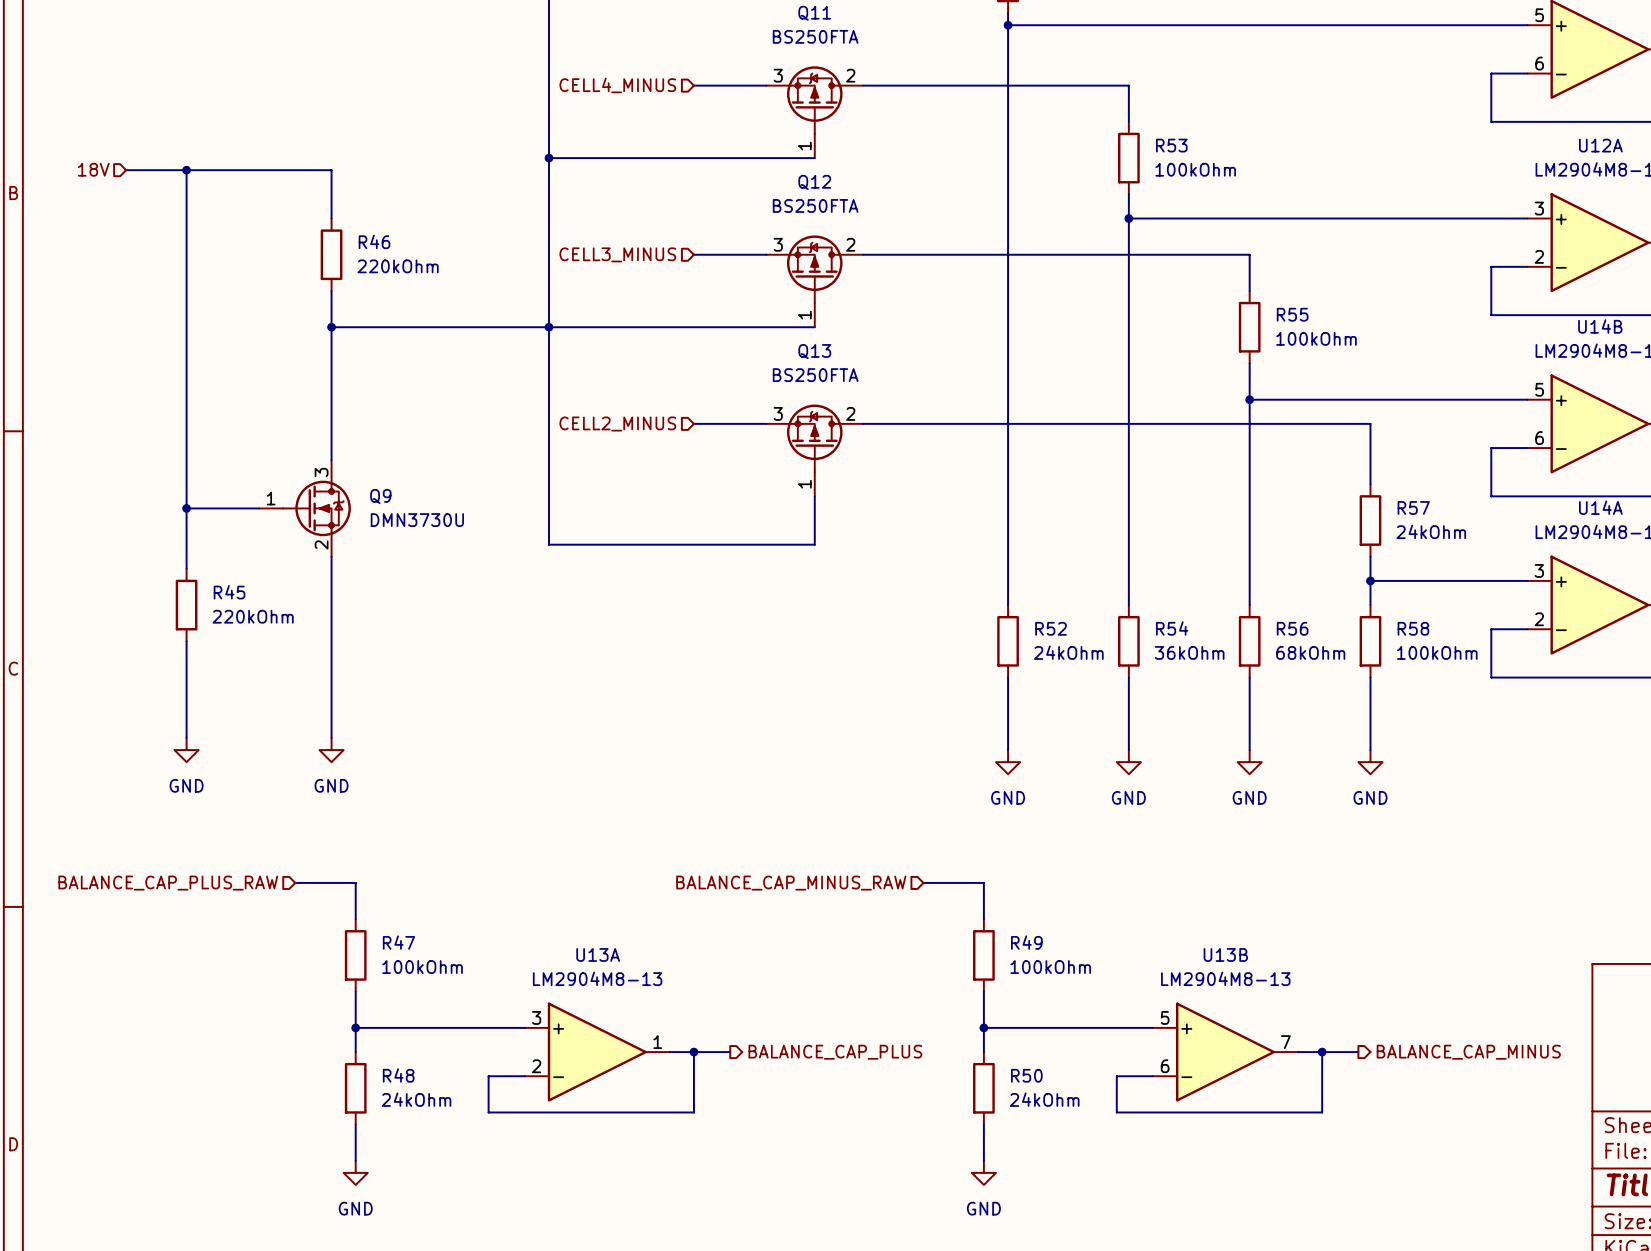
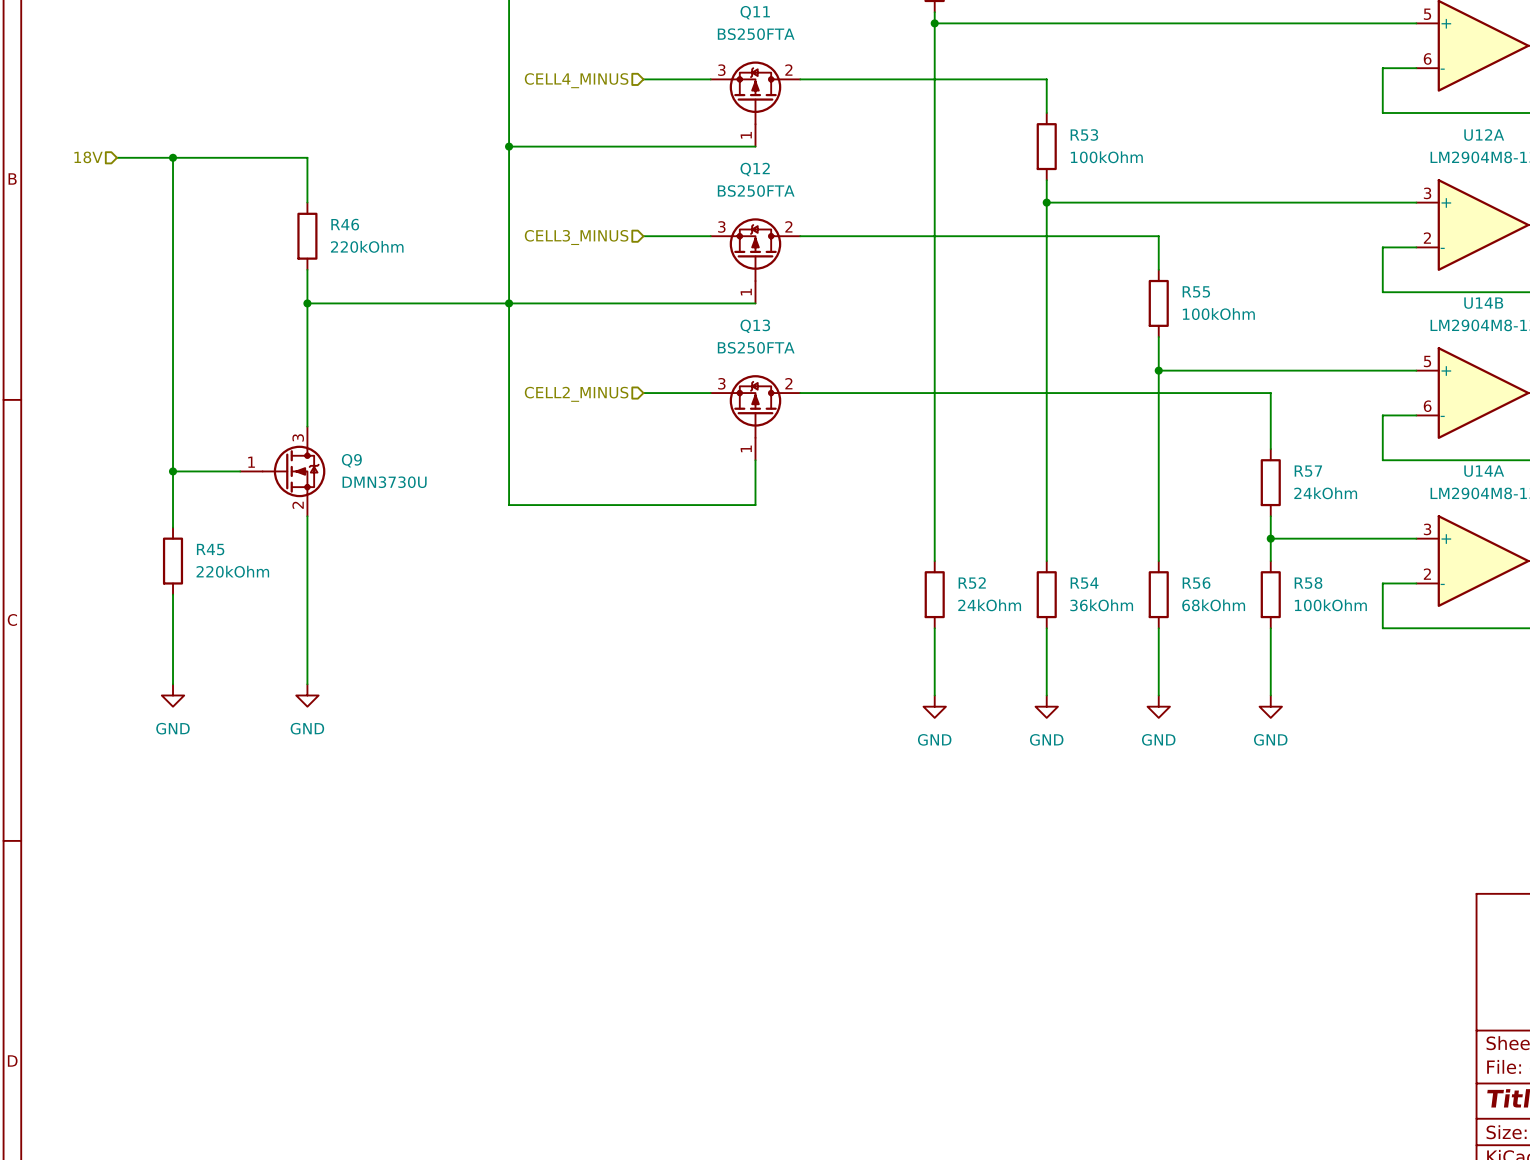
wire: (295, 882) (355, 882) (355, 919) -> none
wire: (923, 882) (983, 882) (983, 919) -> none
hierarchical label: BALANCE_CAP_PLUS_RAW (168, 883) -> none
hierarchical label: BALANCE_CAP_MINUS_RAW (791, 883) -> none
R47: 100kOhm (355, 955) -> none
R49: 100kOhm (983, 955) -> none
wire: (355, 991) (355, 1052) -> none
wire: (983, 991) (983, 1052) -> none
wire: (355, 1027) (524, 1027) -> none
junction: (355, 1027) -> none
wire: (983, 1027) (1153, 1027) -> none
junction: (983, 1027) -> none
U13A: LM2904M8-13 (597, 1052) -> none
wire: (669, 1052) (730, 1052) -> none
wire: (693, 1052) (693, 1112) (488, 1112) (488, 1076) (524, 1076) -> none
junction: (693, 1052) -> none
hierarchical label: BALANCE_CAP_PLUS (835, 1052) -> none
U13B: LM2904M8-13 (1225, 1052) -> none
wire: (1298, 1052) (1358, 1052) -> none
wire: (1322, 1052) (1322, 1112) (1116, 1112) (1116, 1076) (1153, 1076) -> none
junction: (1322, 1052) -> none
hierarchical label: BALANCE_CAP_MINUS (1468, 1052) -> none
R48: 24kOhm (355, 1088) -> none
R50: 24kOhm (983, 1088) -> none
wire: (355, 1124) (355, 1160) -> none
wire: (983, 1124) (983, 1160) -> none
power symbol: GND (355, 1172) -> none
power symbol: GND (983, 1172) -> none

